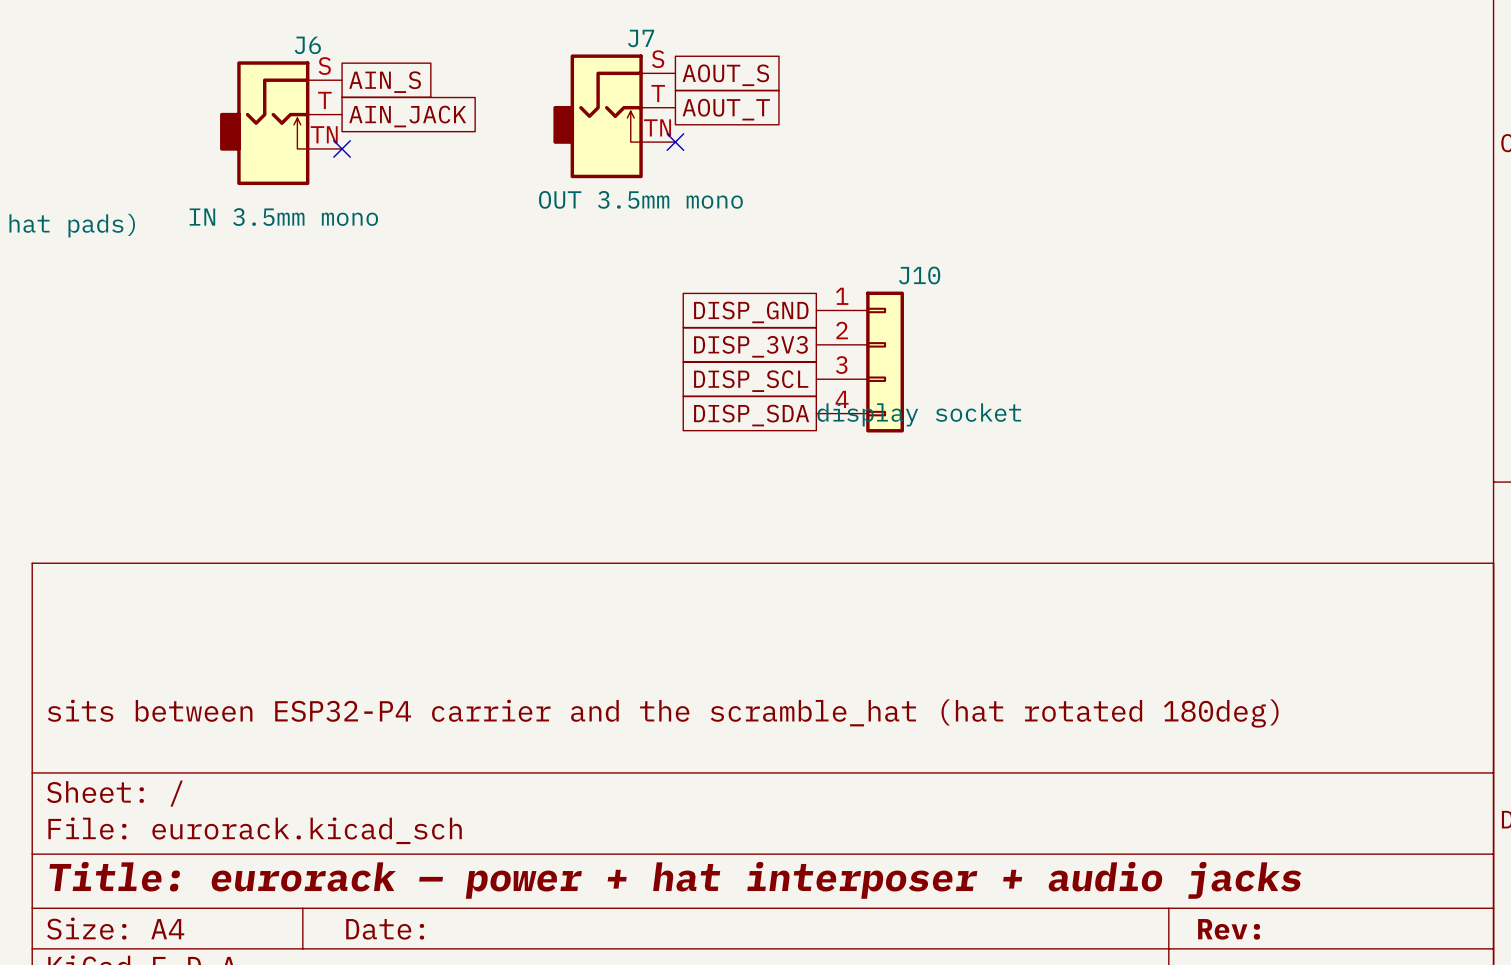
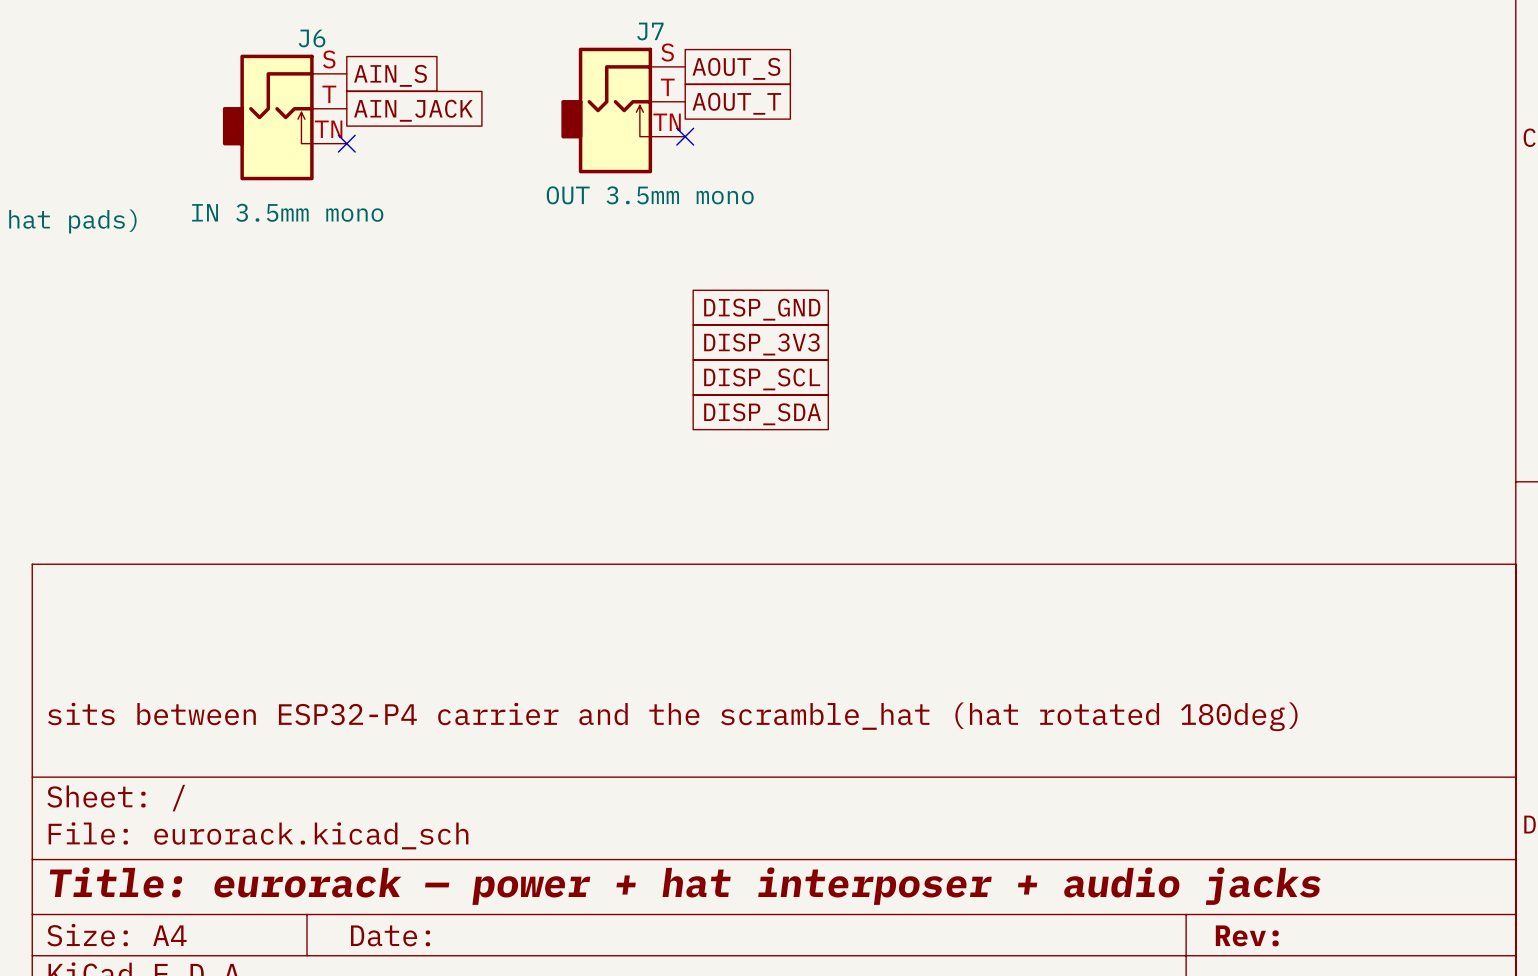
J10: display socket (860, 362) -> none

